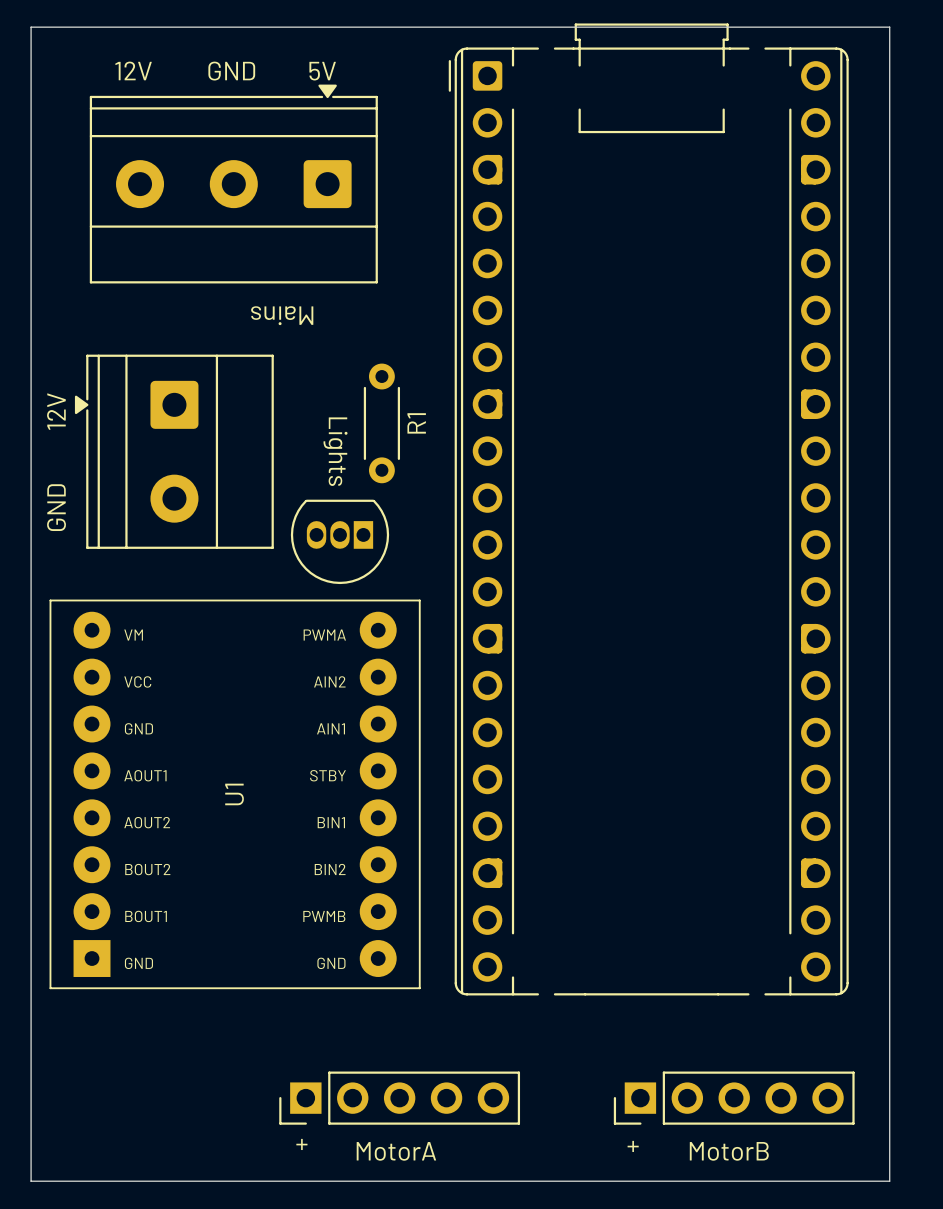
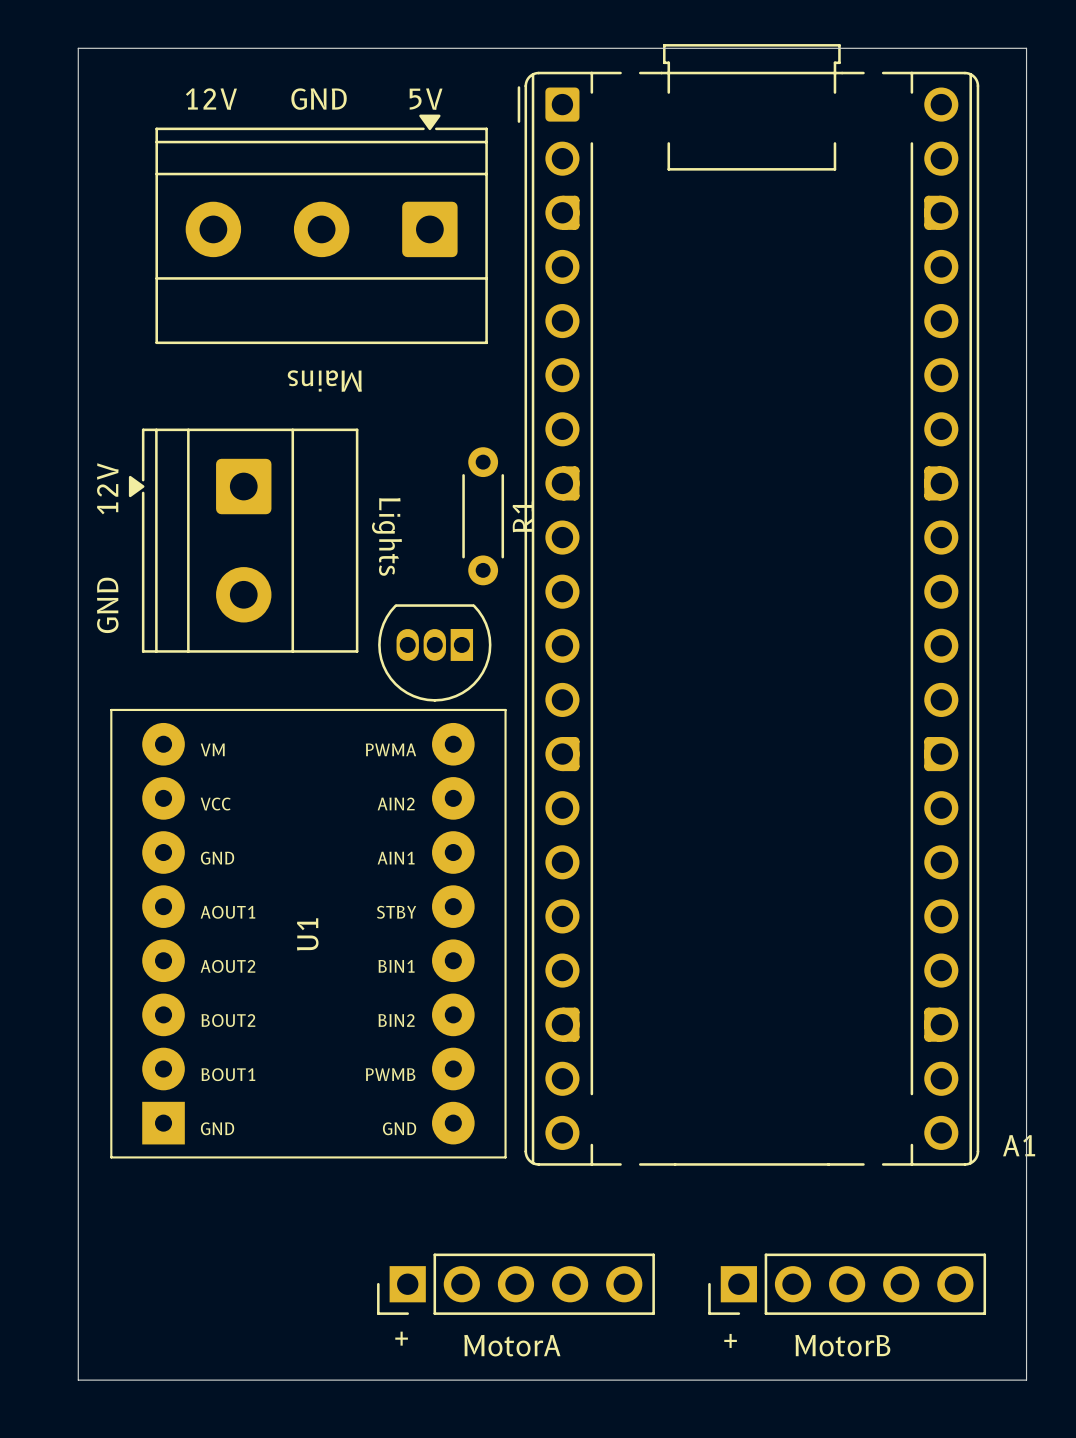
board edge: (68, 27) (31, 27) (31, 1181) (68, 1181) -> (78, 48) (78, 1380)
text position: 12V (133, 70) -> 12V (211, 99)
text position: GND (231, 71) -> GND (319, 99)
text position: 5V (322, 71) -> 5V (426, 99)
part position: (233, 184) -> (321, 229)
text position: 12V (56, 411) -> 12V (107, 488)
R1 position: (381, 423) -> (483, 516)
part position: (174, 451) -> (243, 540)
text position: GND (56, 507) -> GND (107, 605)
part position: (339, 541) -> (434, 652)
U1 footprint: [49, 599, 421, 990] -> [110, 708, 507, 1159]
A1 name: none -> A1 (1019, 1145)
part position: (399, 1098) -> (515, 1284)
text position: + (301, 1144) -> + (401, 1338)
text position: MotorA (396, 1151) -> MotorA (512, 1345)

